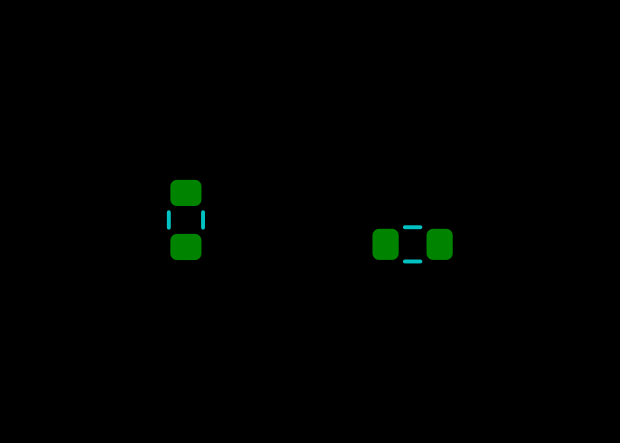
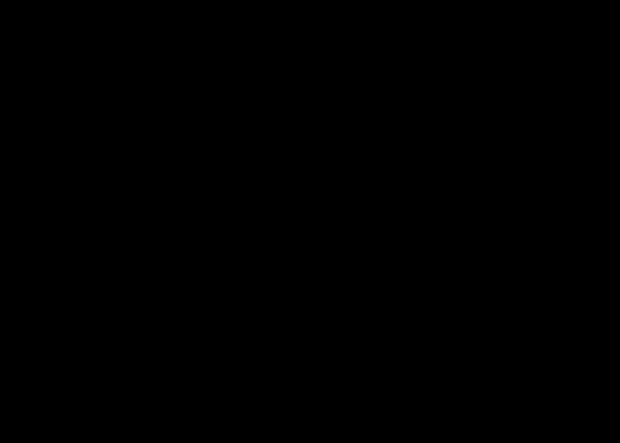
part: (185, 219) -> none
part: (412, 244) -> none

